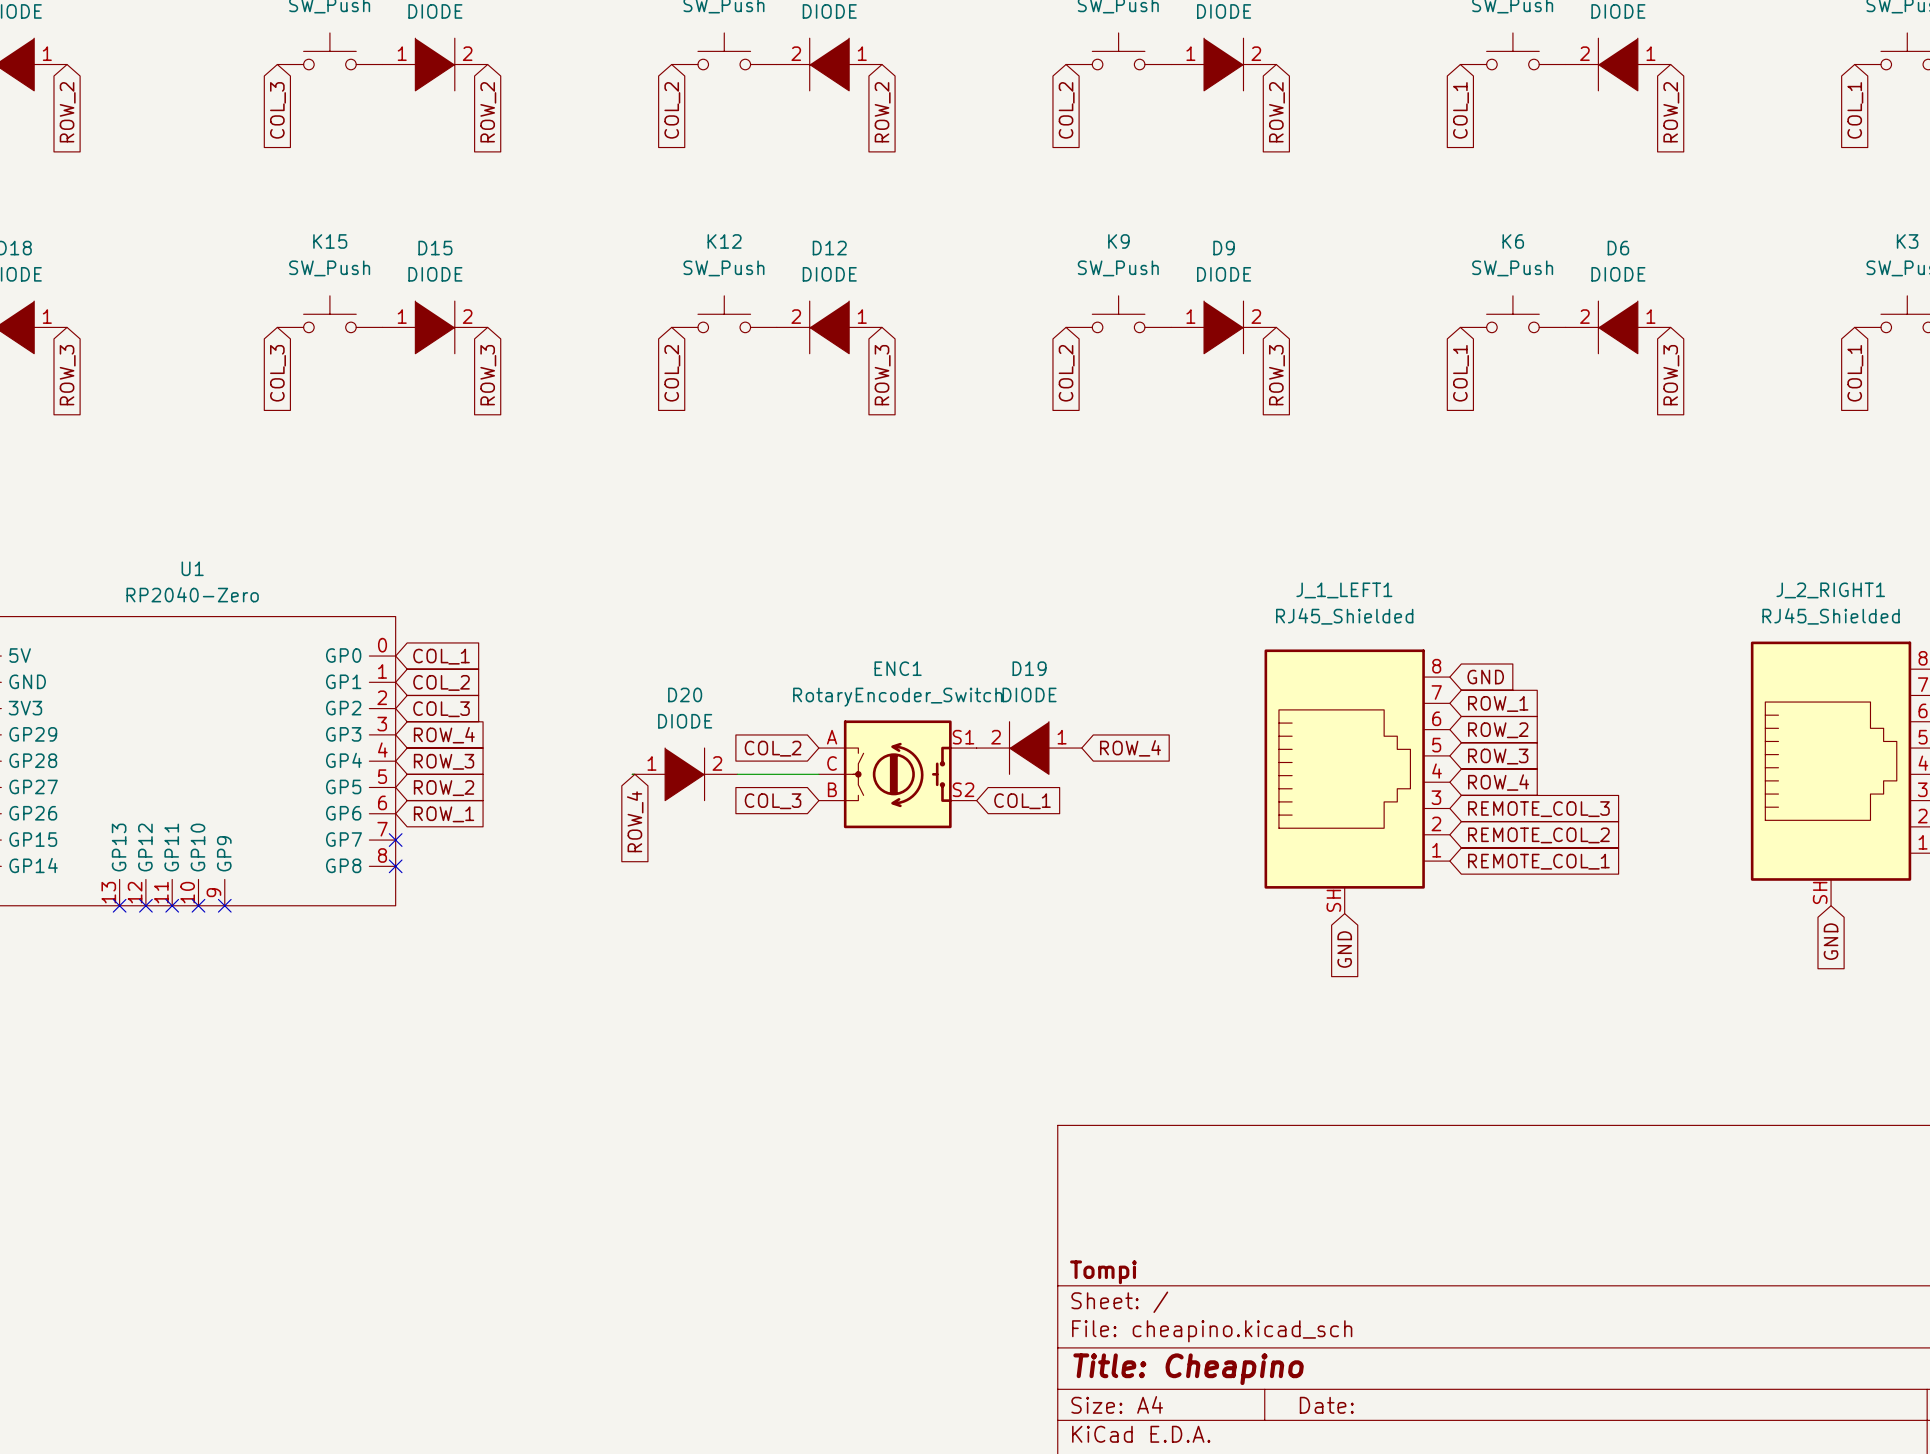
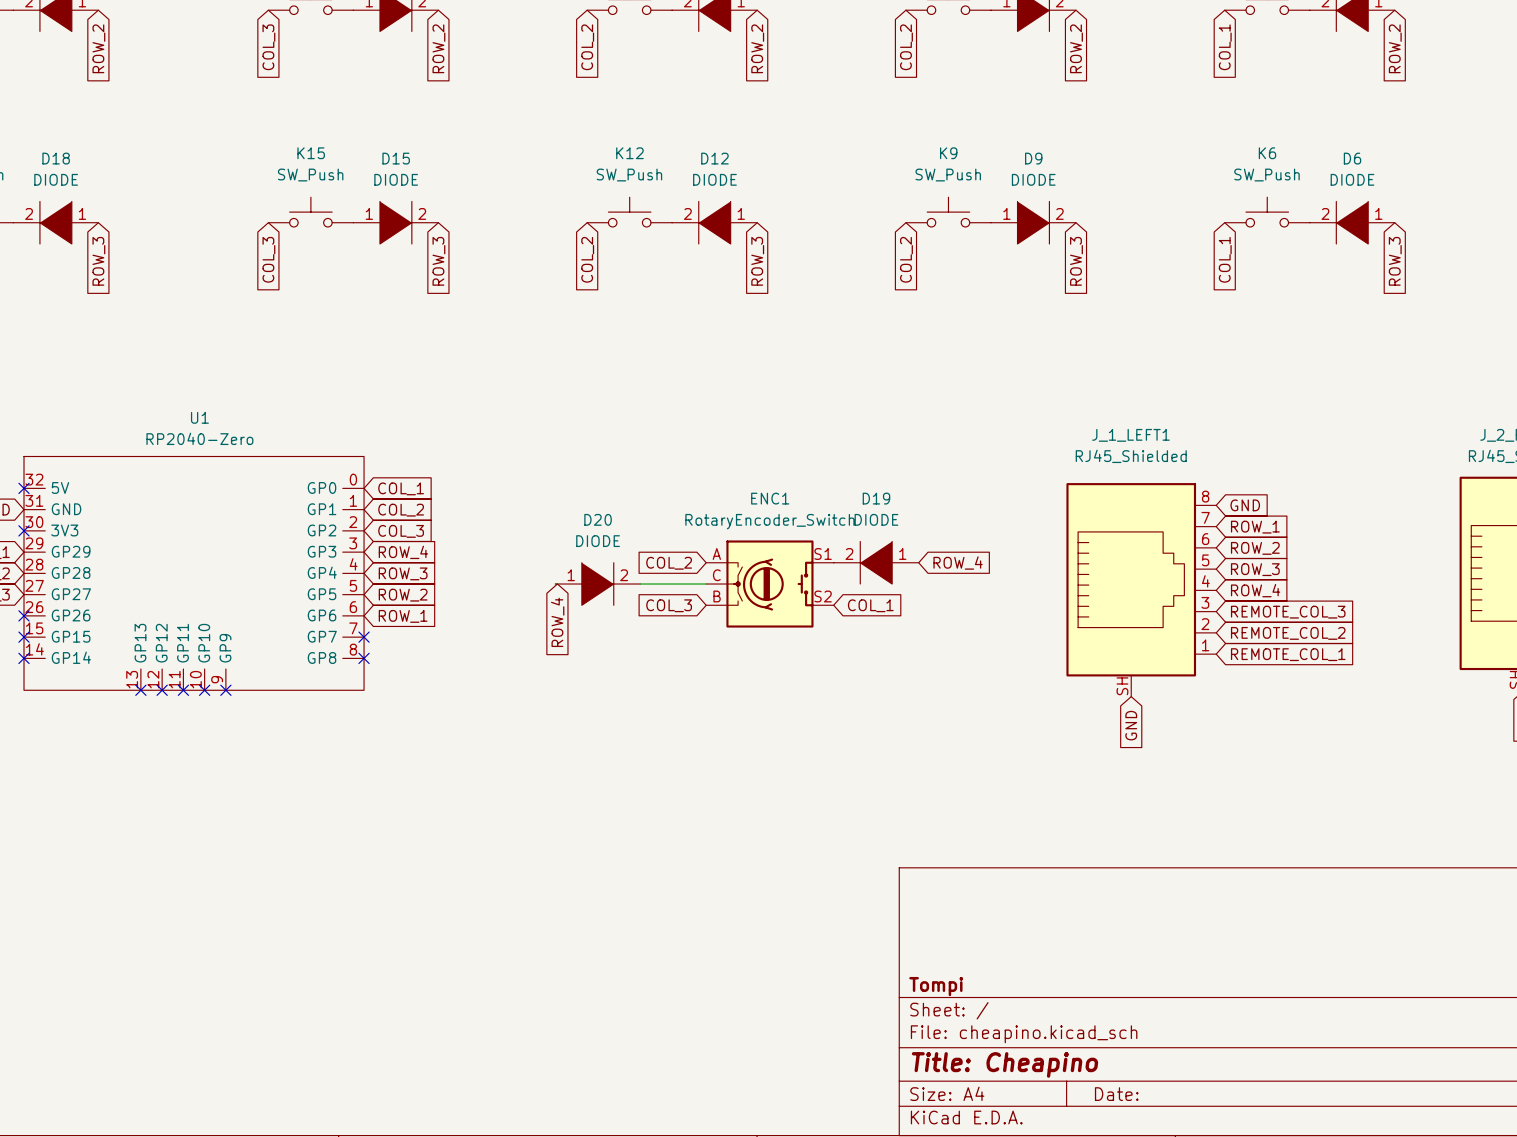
ENC1 symbol: [818, 720, 977, 829] -> [706, 540, 834, 628]

